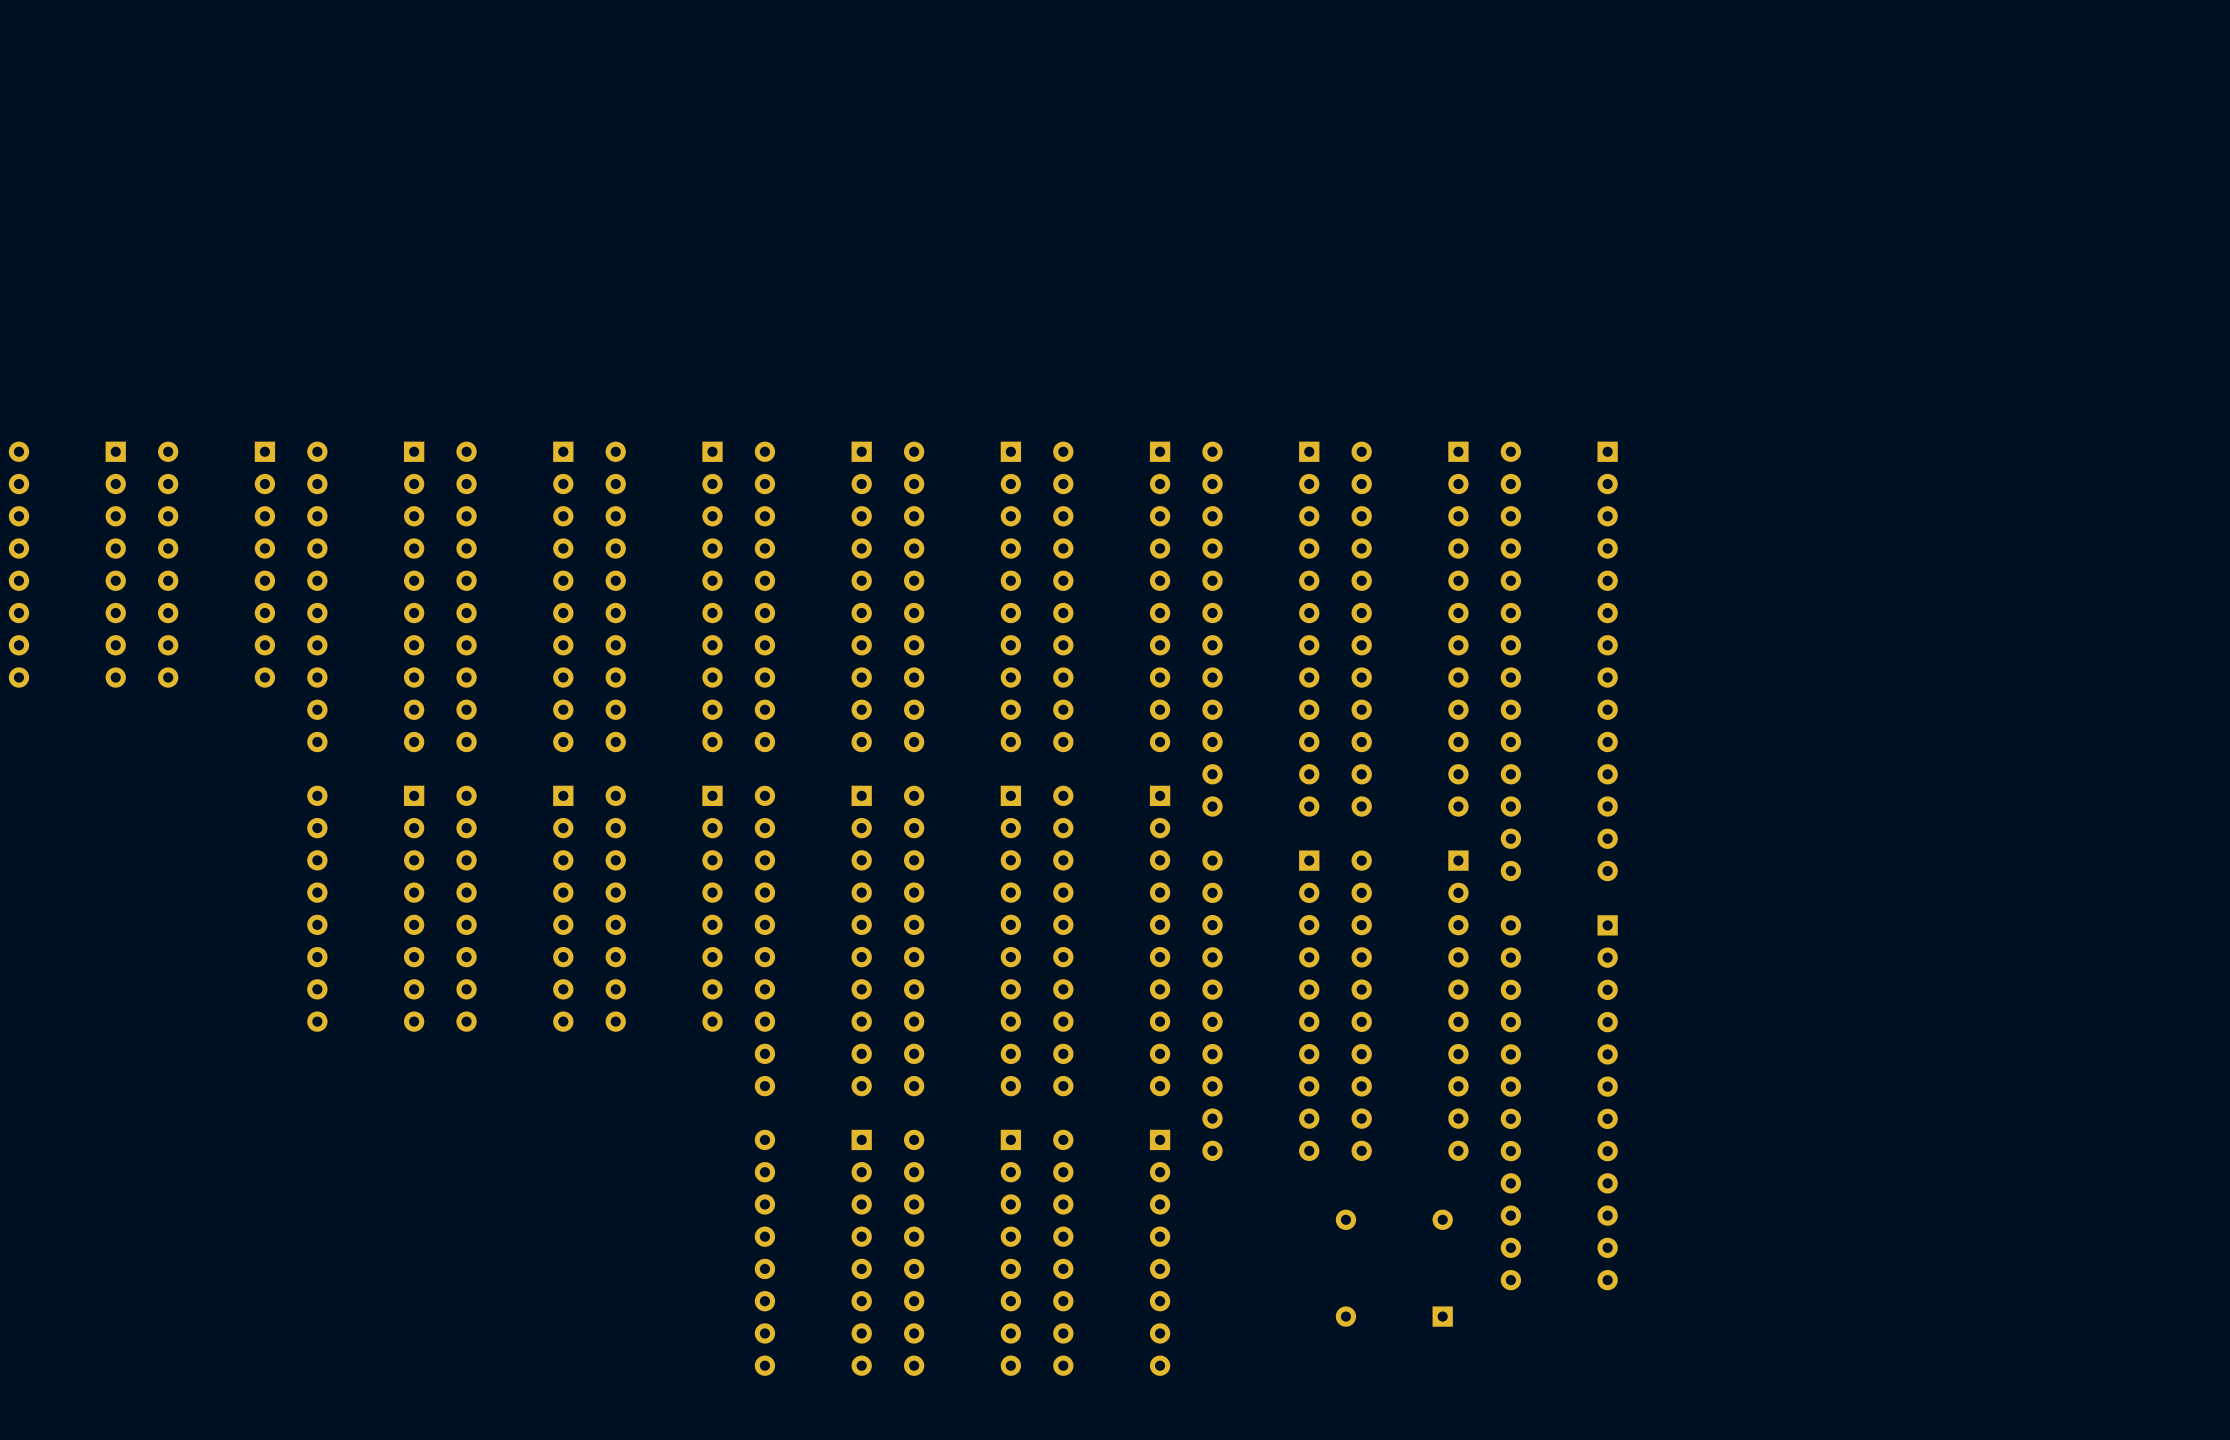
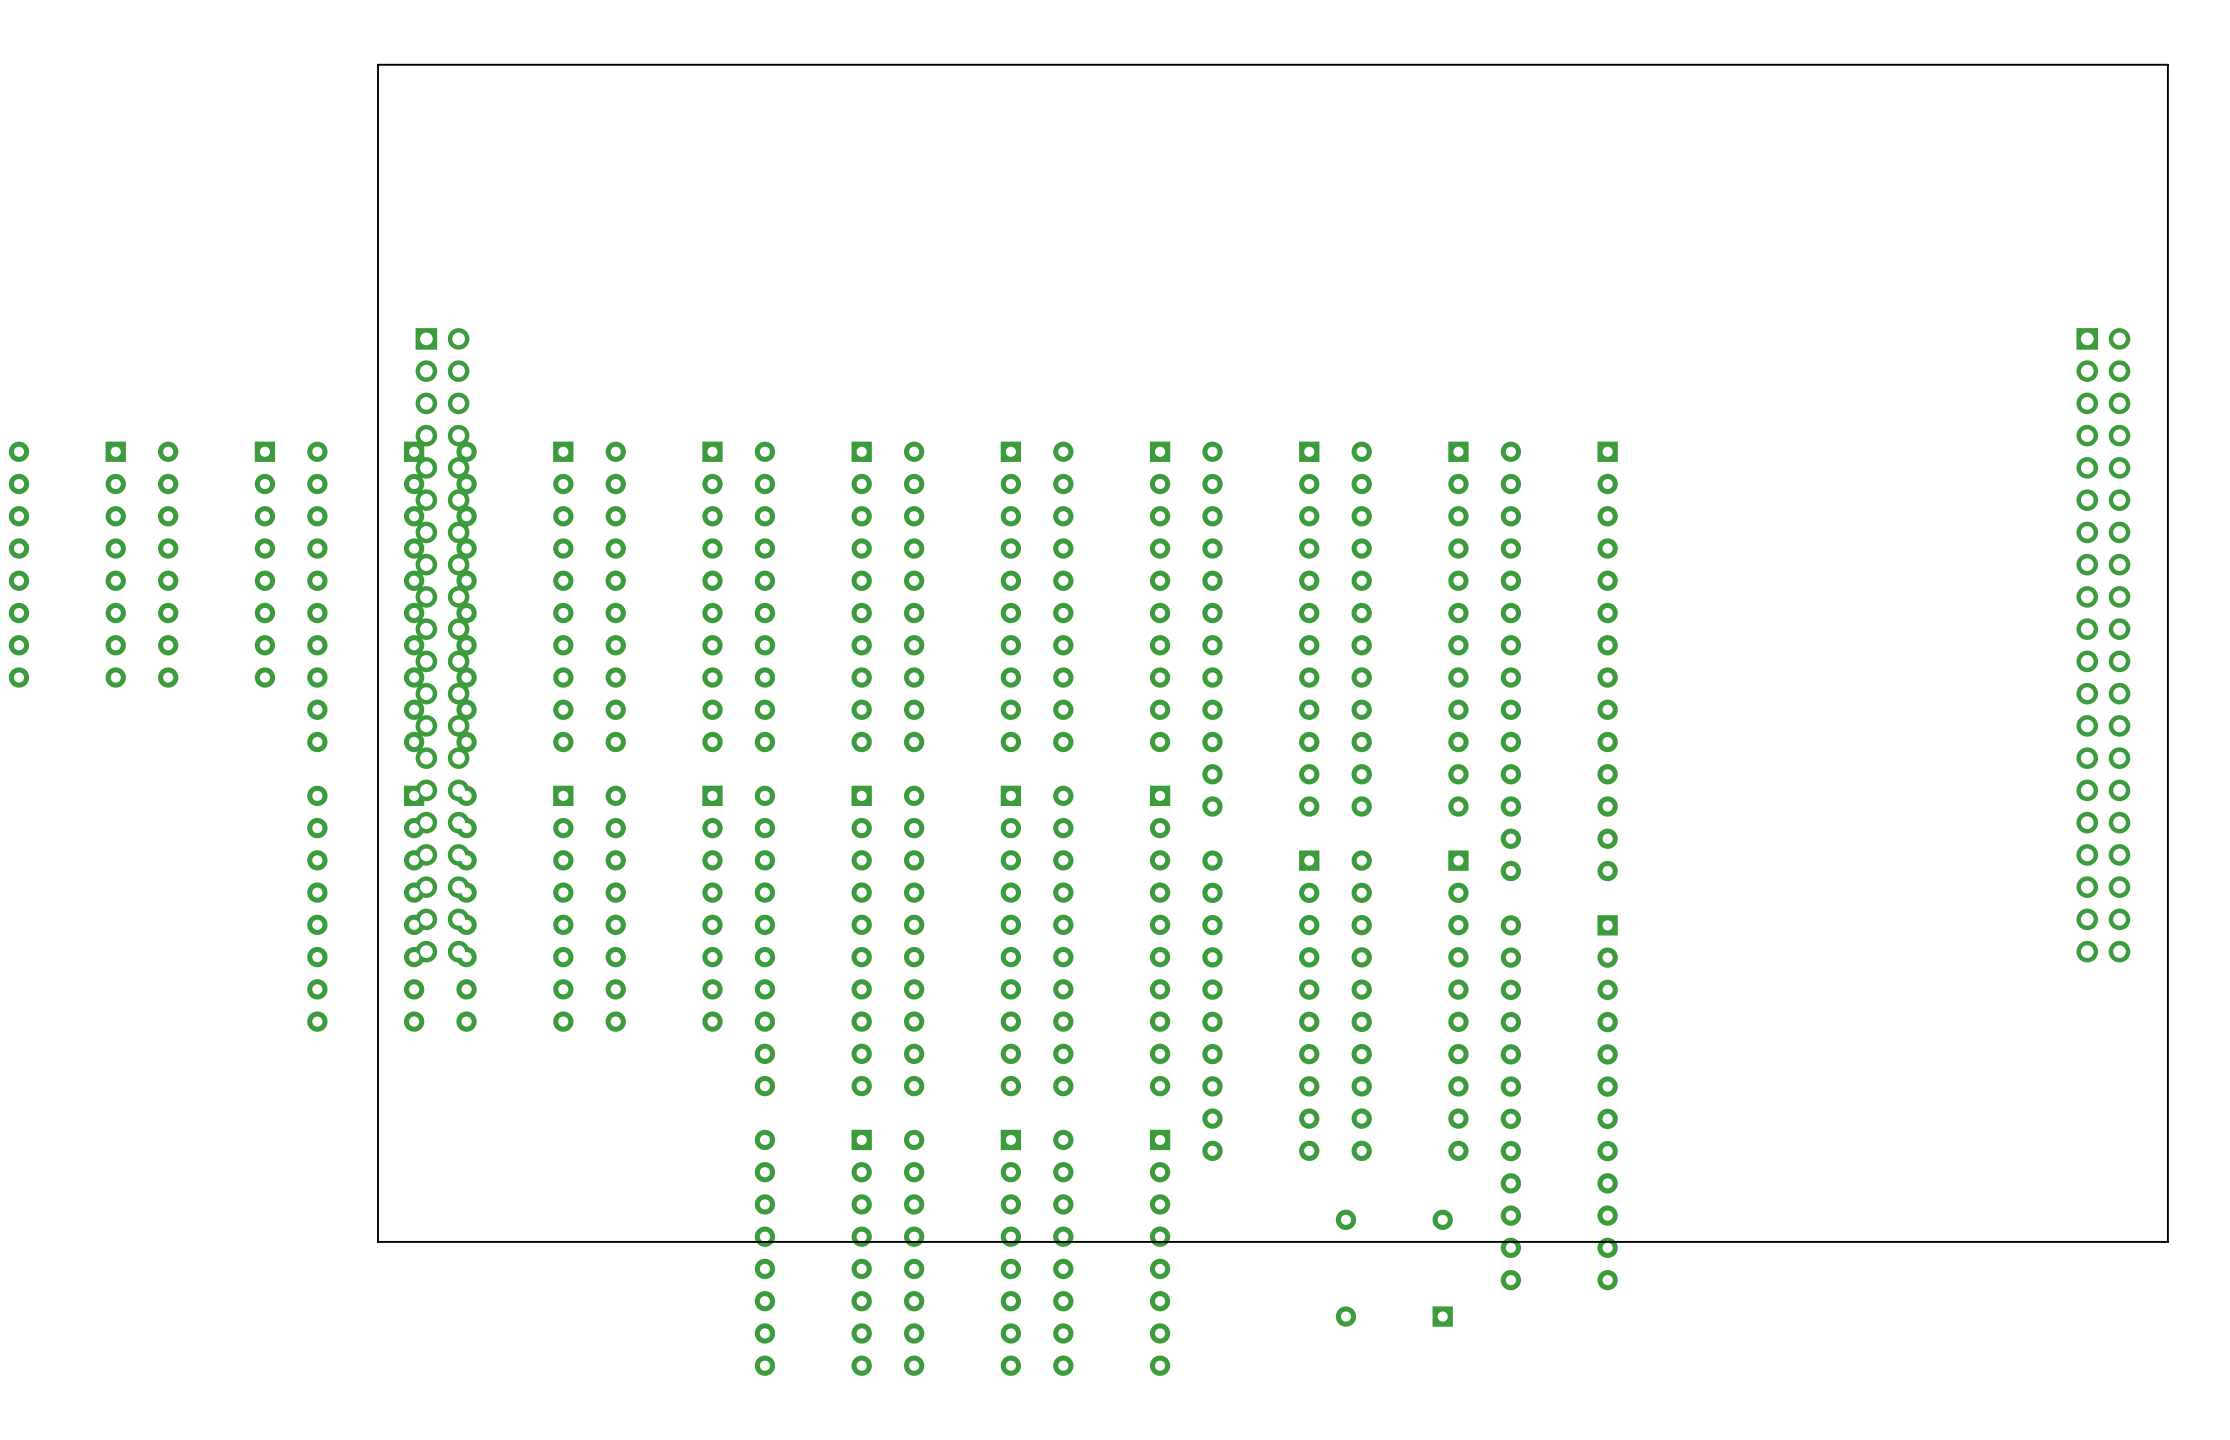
board edge: none -> (2167, 64) (2167, 1241) (378, 1241) (378, 64) (2167, 64)
part: none -> (442, 645)
part: none -> (2103, 645)

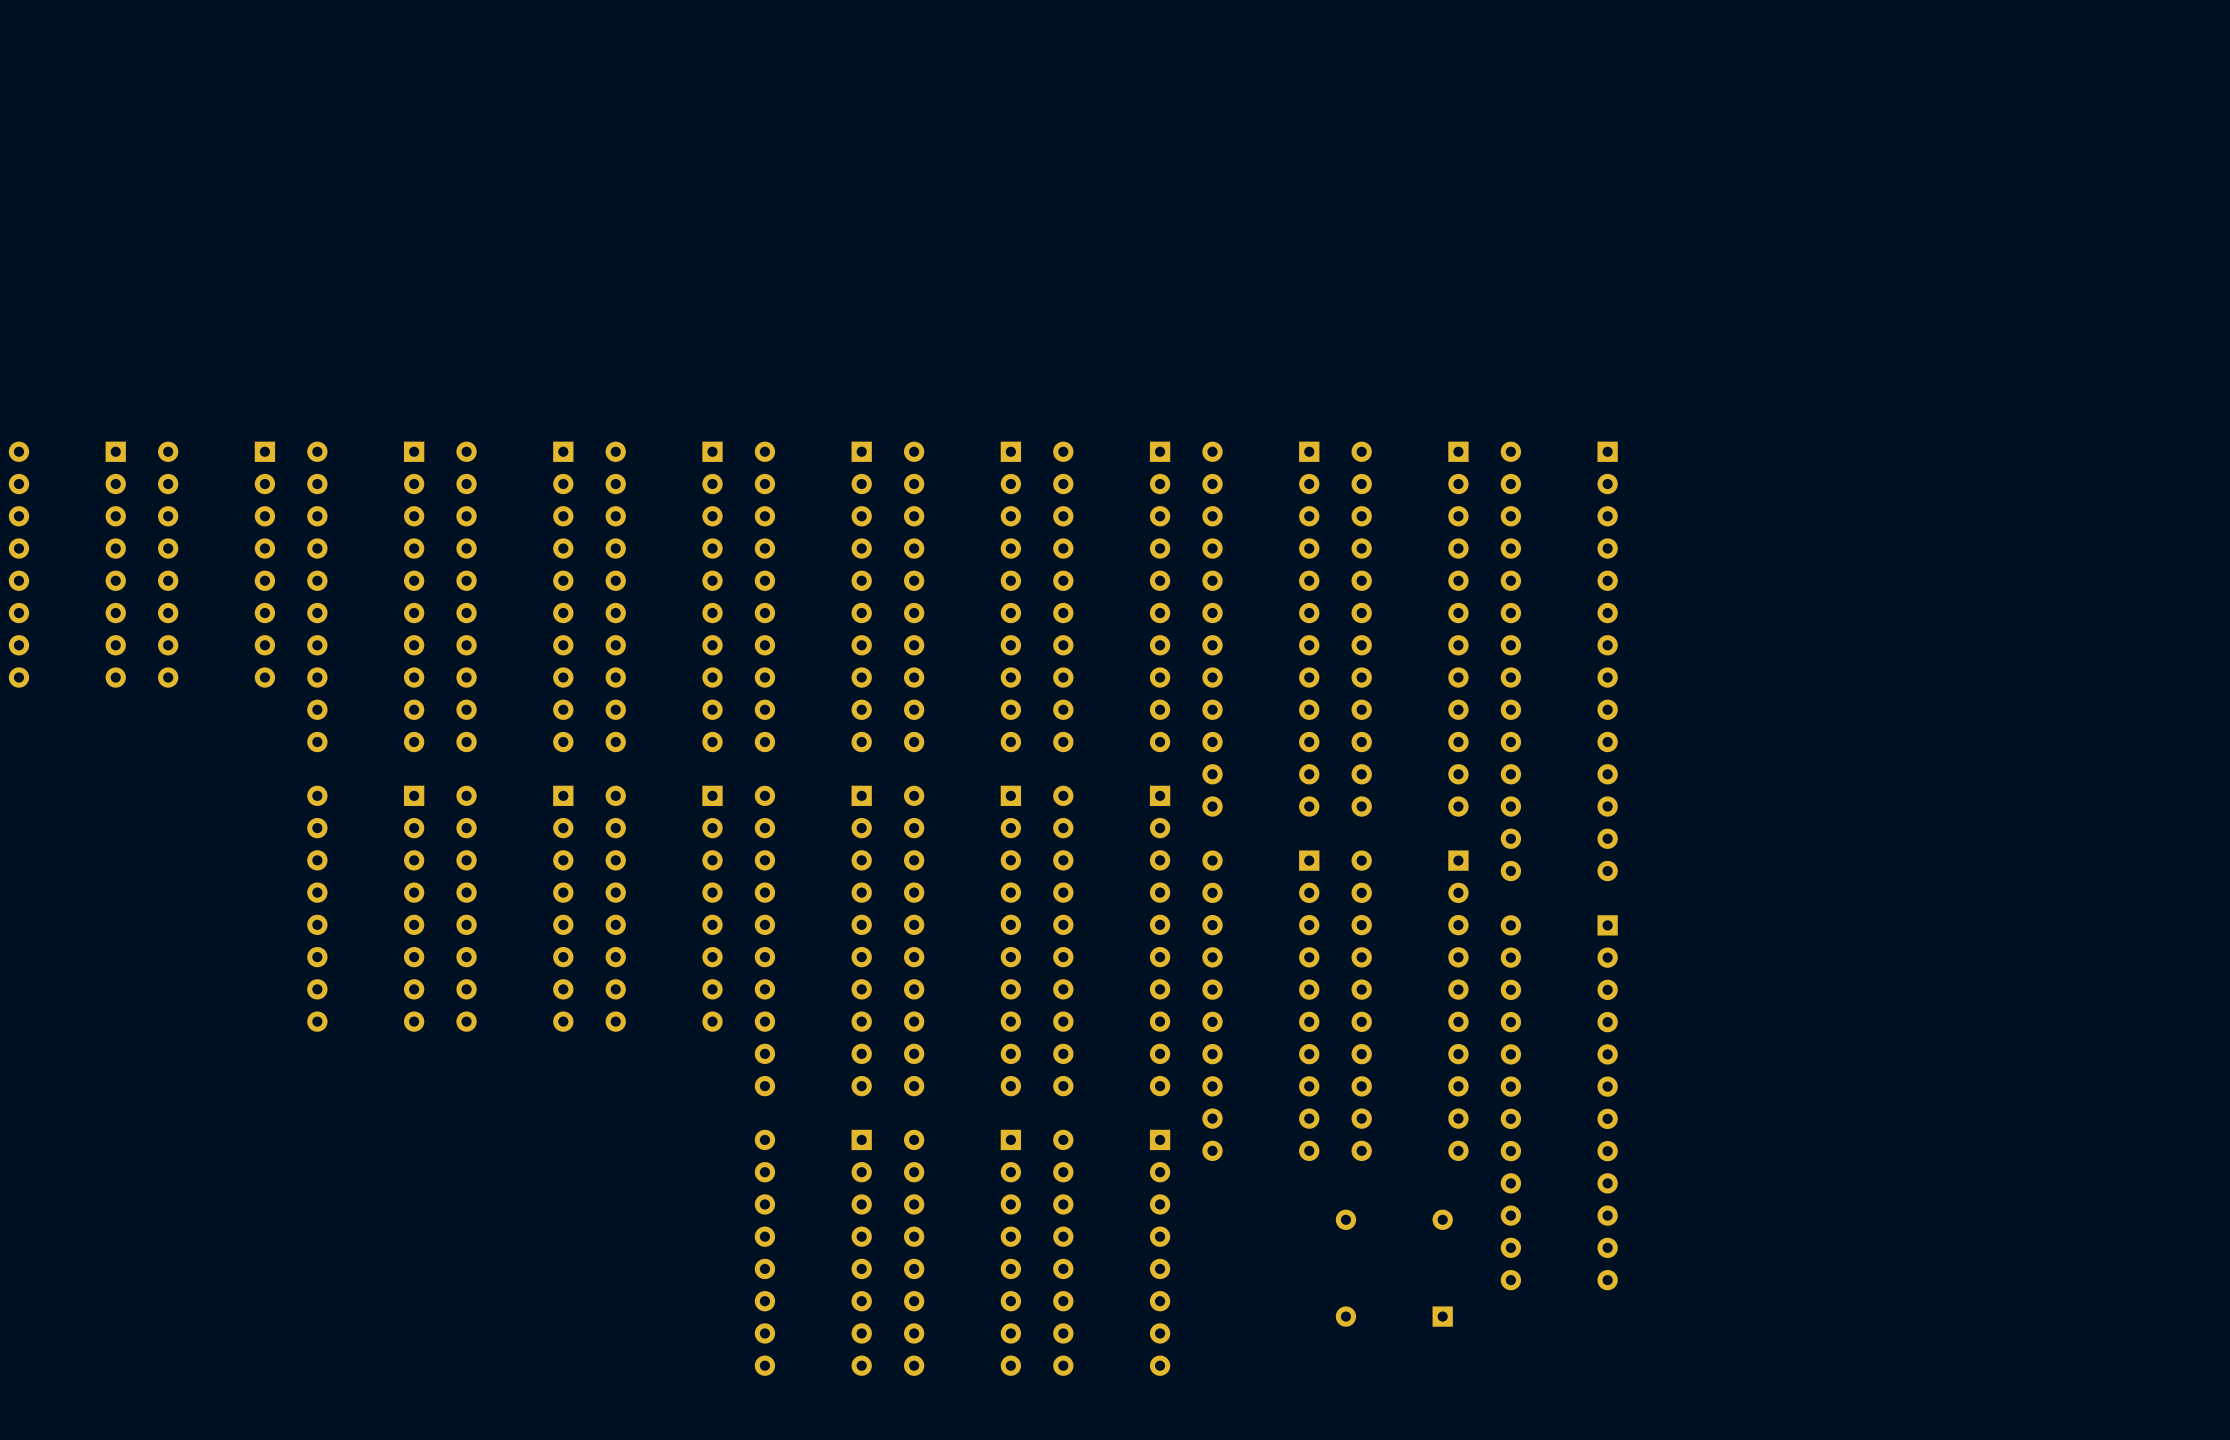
board edge: (2167, 64) (2167, 1241) (378, 1241) (378, 64) (2167, 64) -> none
part: (442, 645) -> none
part: (2103, 645) -> none

